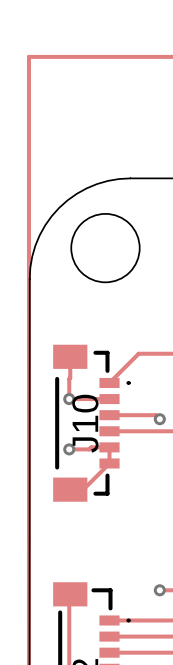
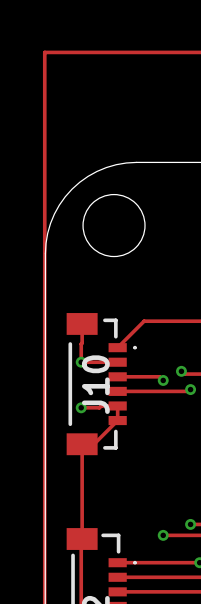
track: none -> (82, 444) (82, 539)

